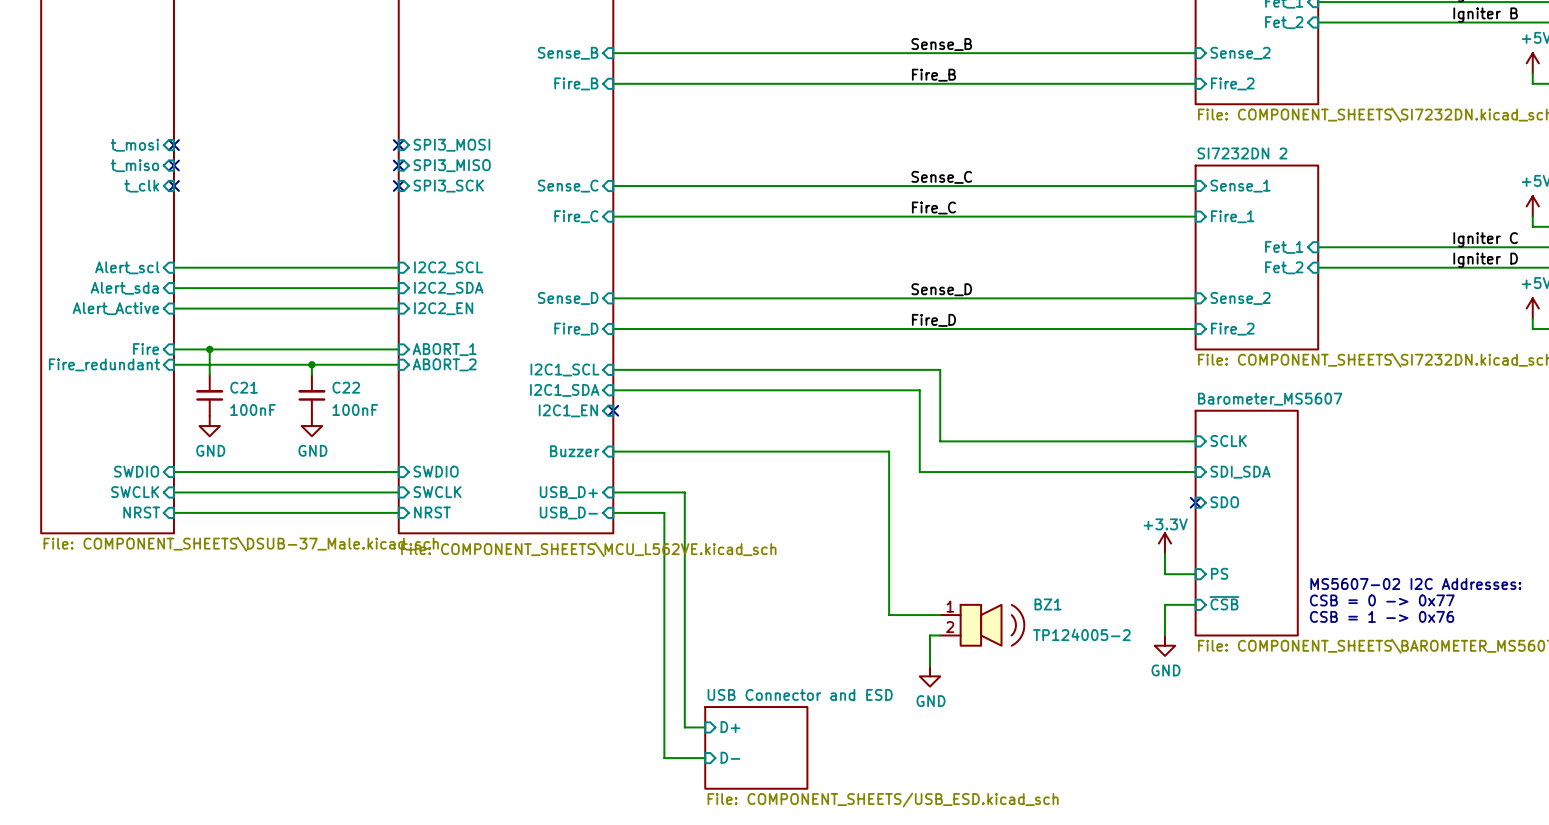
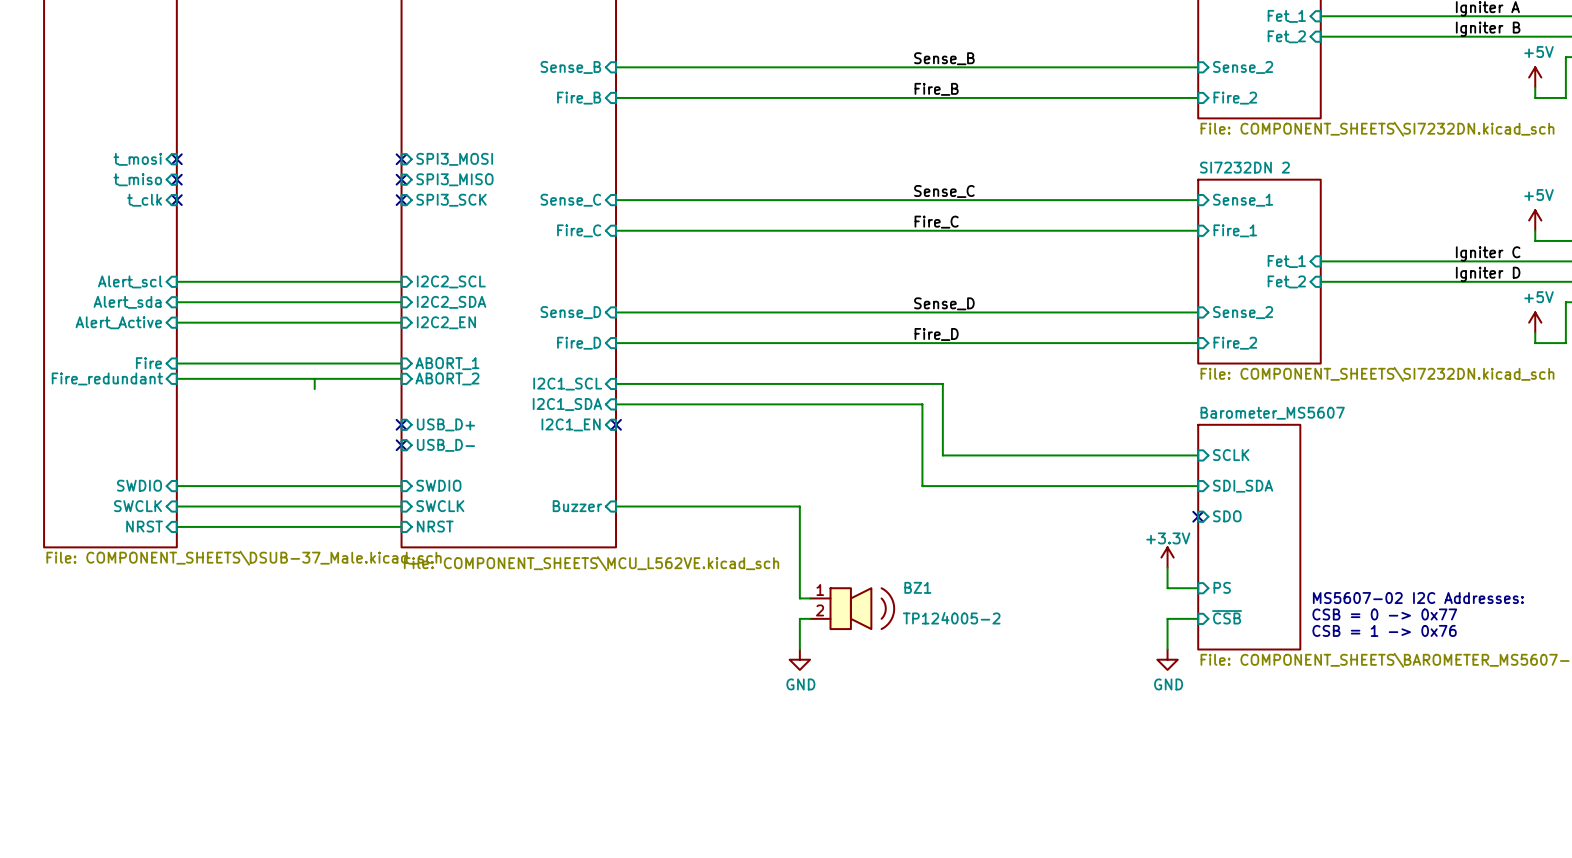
wire: (209, 349) (209, 374) -> none
junction: (209, 349) -> none
junction: (311, 364) -> none
C21: 100nF (209, 395) -> none
C22: 100nF (311, 395) -> none
no-connect mark: none -> (401, 424)
sheet pin: none -> USB_D+ (445, 424)
power symbol: GND (209, 426) -> none
power symbol: GND (311, 426) -> none
no-connect mark: none -> (401, 445)
sheet pin: none -> USB_D- (445, 445)
sheet pin: Buzzer (574, 451) -> none
wire: (613, 451) (889, 451) (889, 615) (940, 615) -> none
sheet pin: USB_D+ (568, 492) -> Buzzer (577, 506)
wire: (684, 492) (684, 727) (705, 727) -> (687, 506) (799, 506) (799, 598) (810, 598)
wire: (613, 512) (664, 512) (664, 758) (705, 758) -> none
sheet pin: USB_D- (568, 513) -> none
BZ1 position: (982, 625) -> (852, 608)
wire: (940, 635) (929, 635) (929, 666) -> (810, 618) (799, 618) (799, 649)
power symbol position: GND (929, 676) -> GND (799, 659)
sheet pin: D+ (730, 727) -> none
sheet USB Connector and ESD: File: COMPONENT_SHEETS/USB_ESD.kicad_sch (756, 747) -> none
sheet pin: D- (730, 757) -> none

